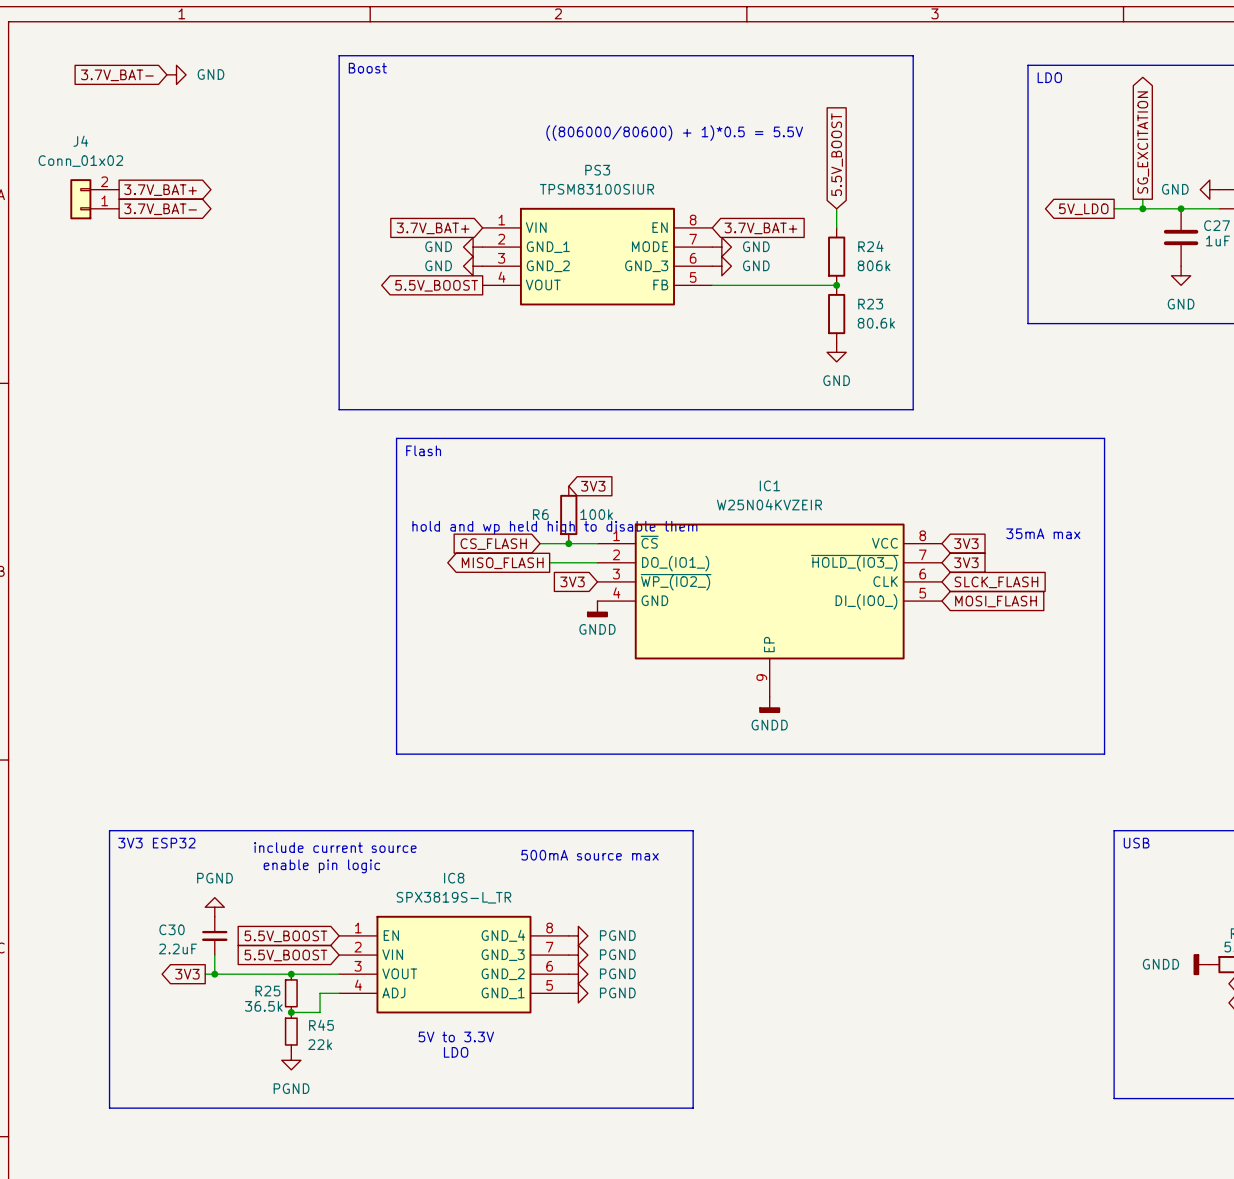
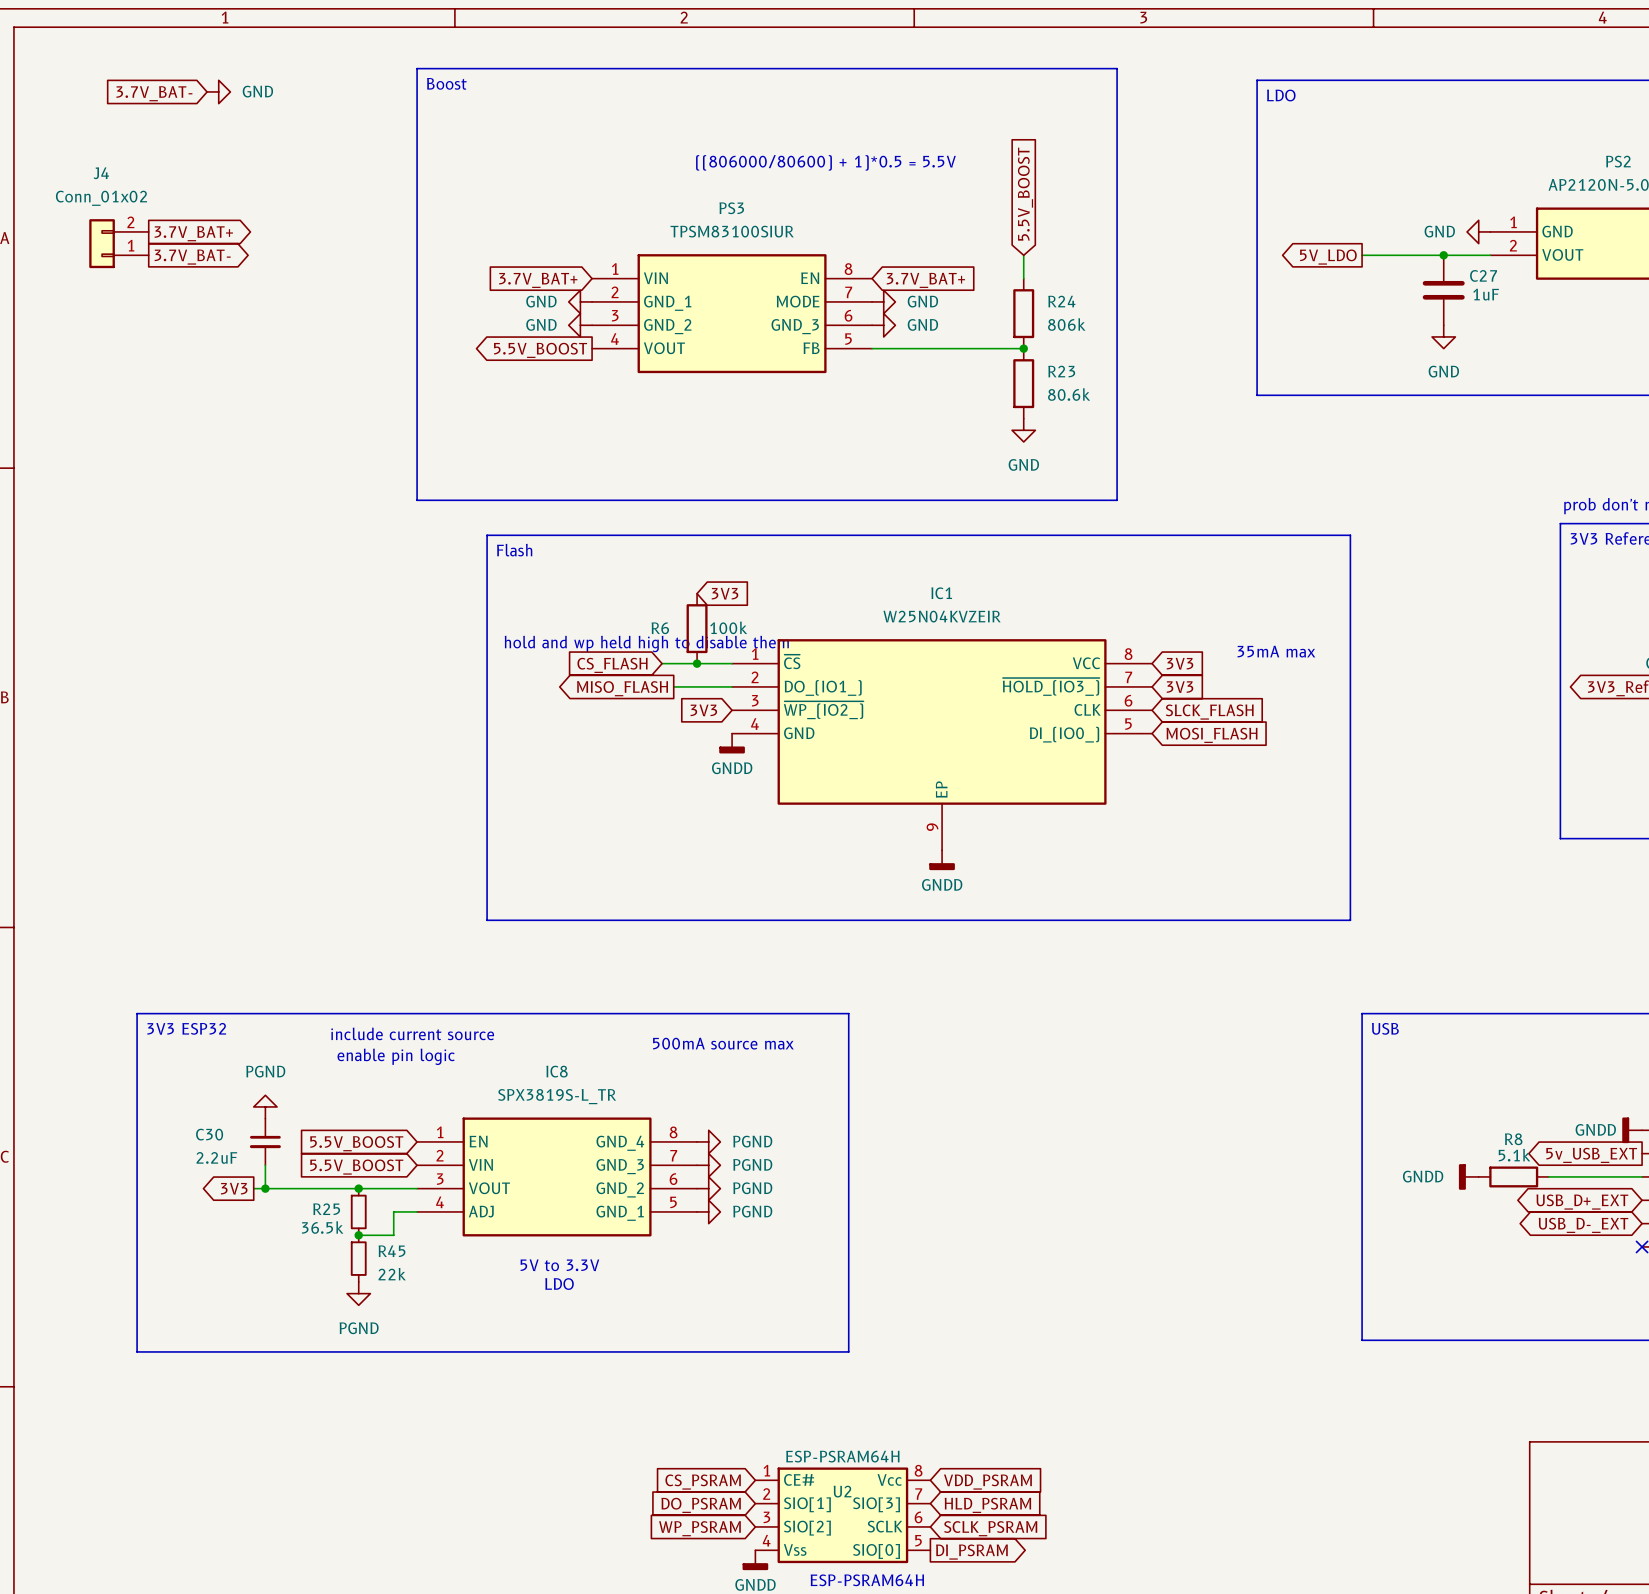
global label: SG_EXCITATION (1143, 142) -> none
wire: (1142, 199) (1142, 208) -> none
junction: (1142, 208) -> none

